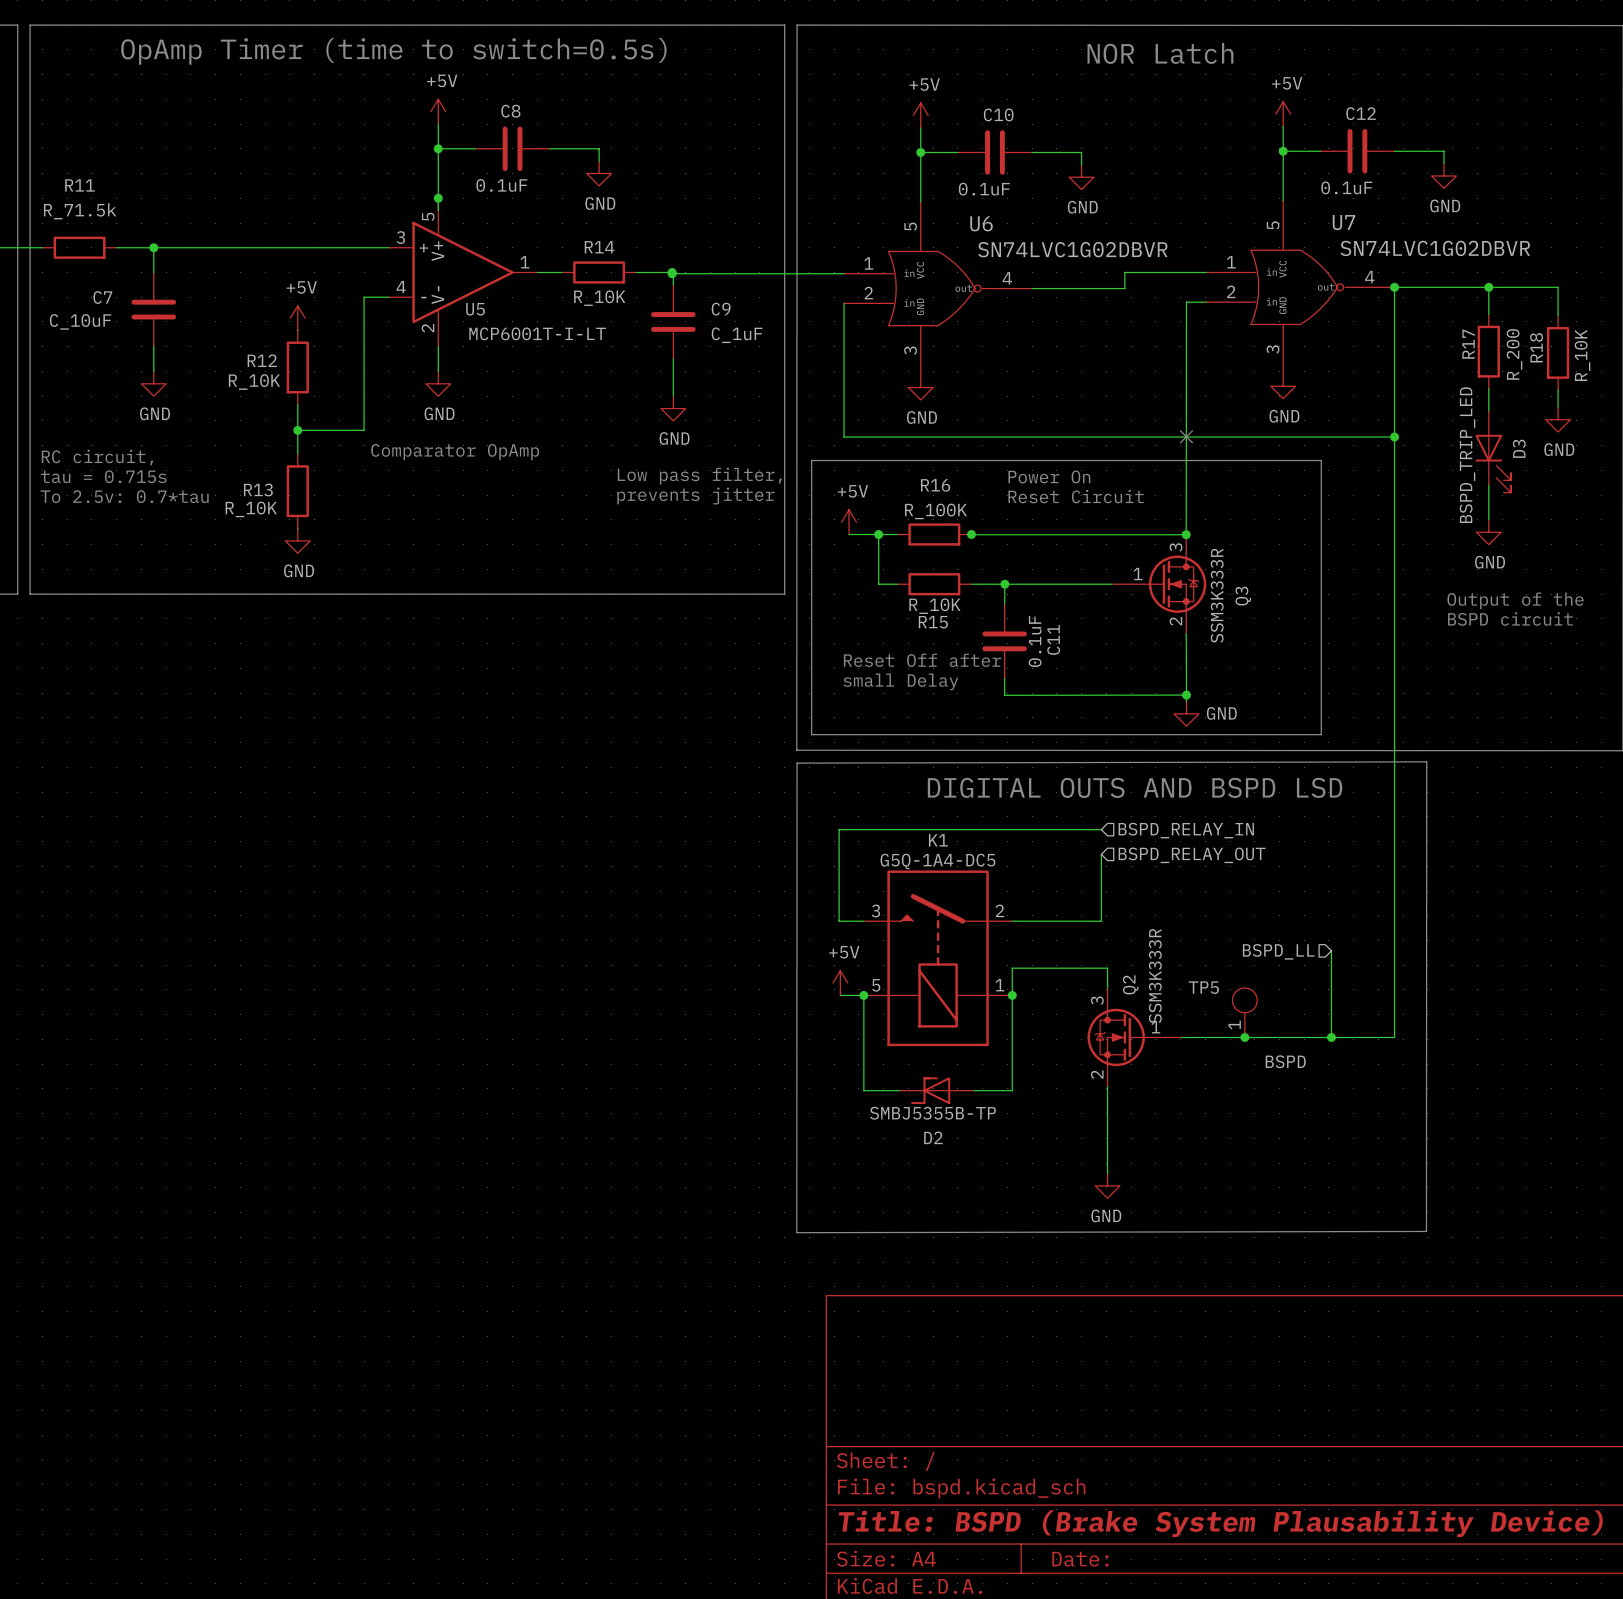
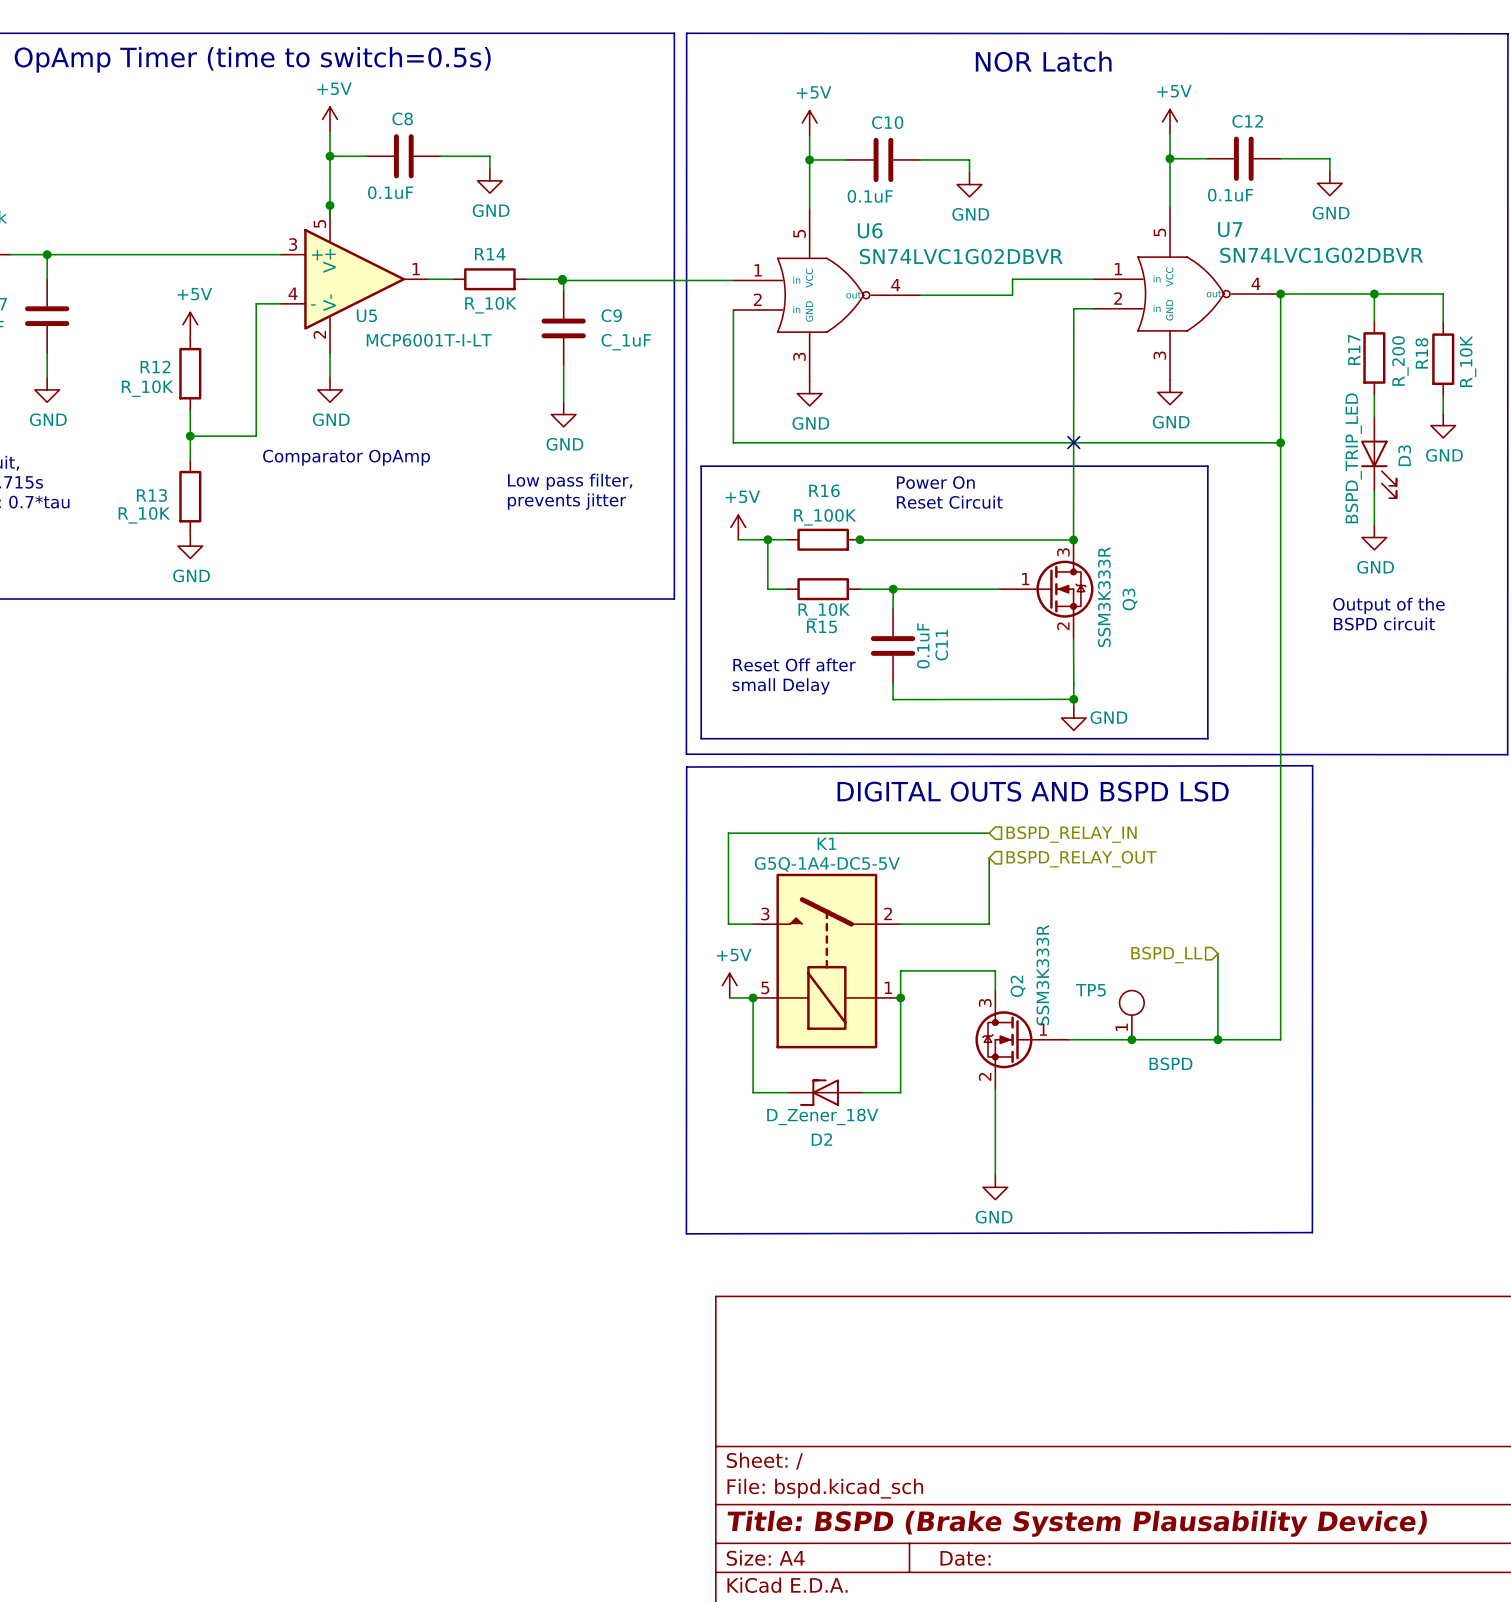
K1 value: G5Q-1A4-DC5 (937, 861) -> G5Q-1A4-DC5-5V (827, 864)
D2 value: SMBJ5355B-TP (933, 1113) -> D_Zener_18V (822, 1116)

